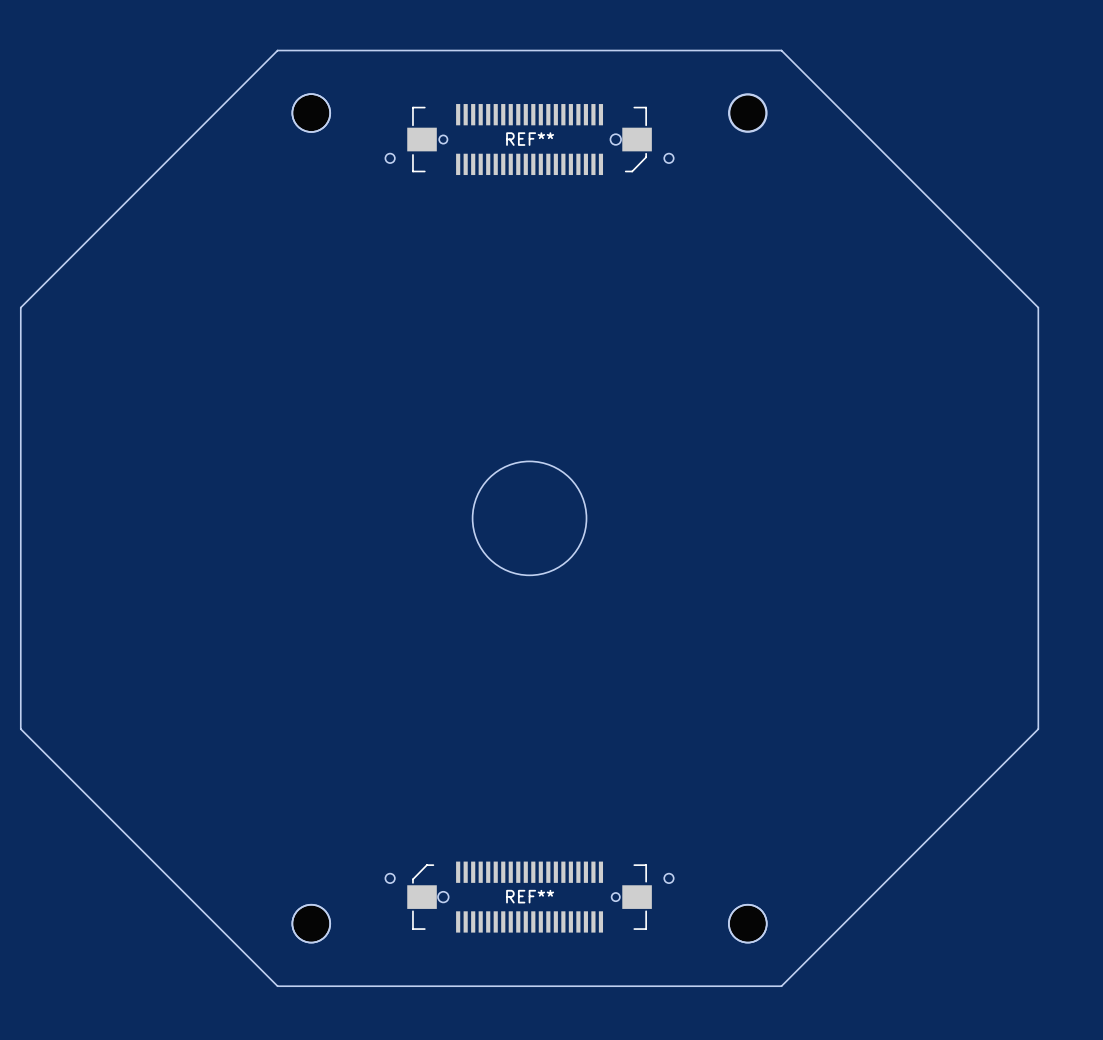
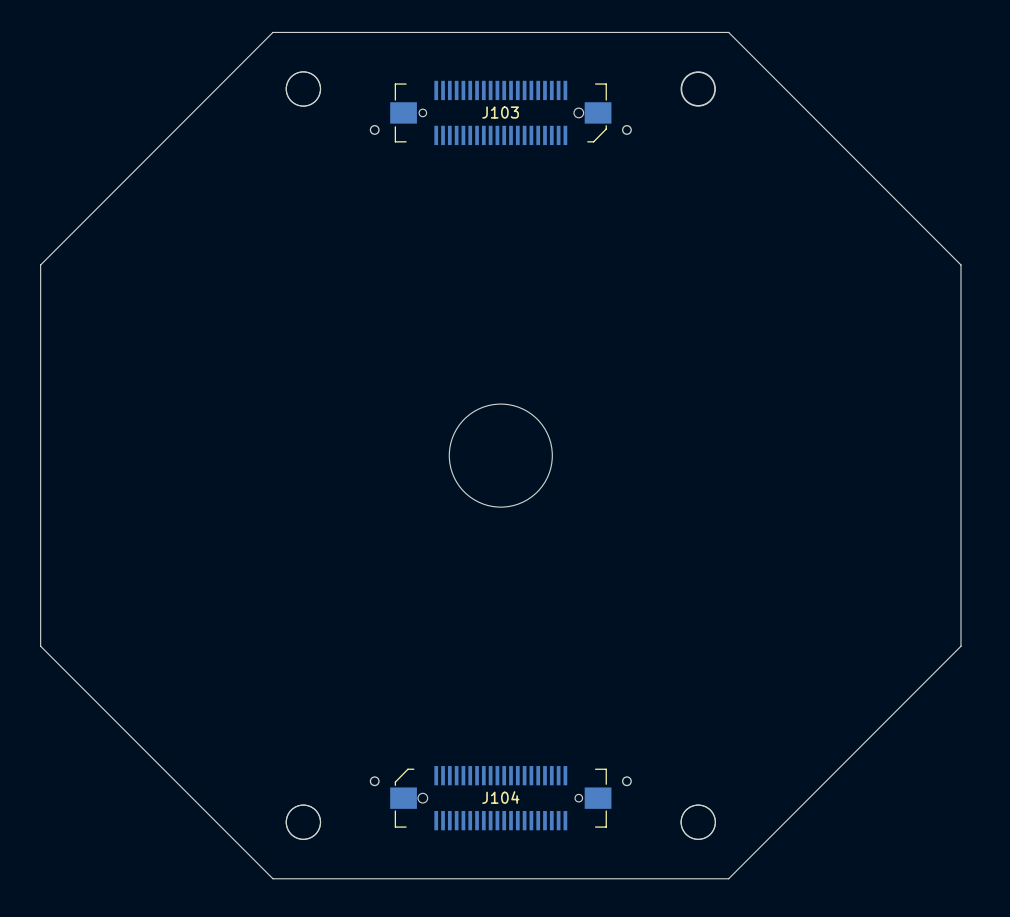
REF** name: REF** (530, 139) -> J103 (500, 112)
REF** name: REF** (530, 896) -> J104 (500, 797)

